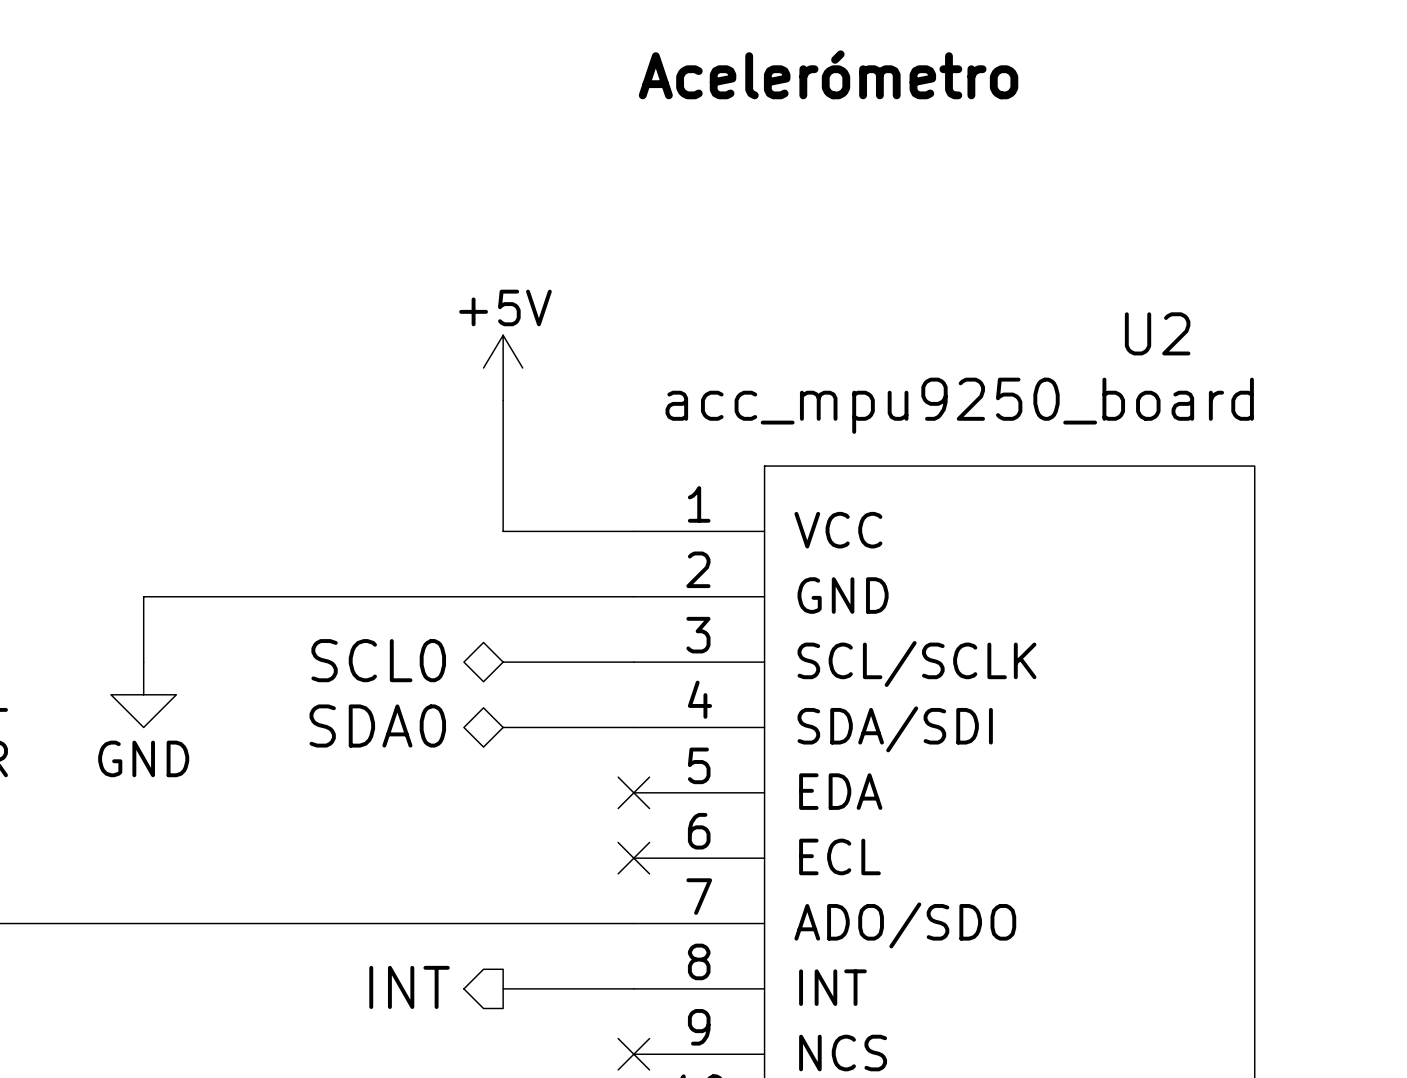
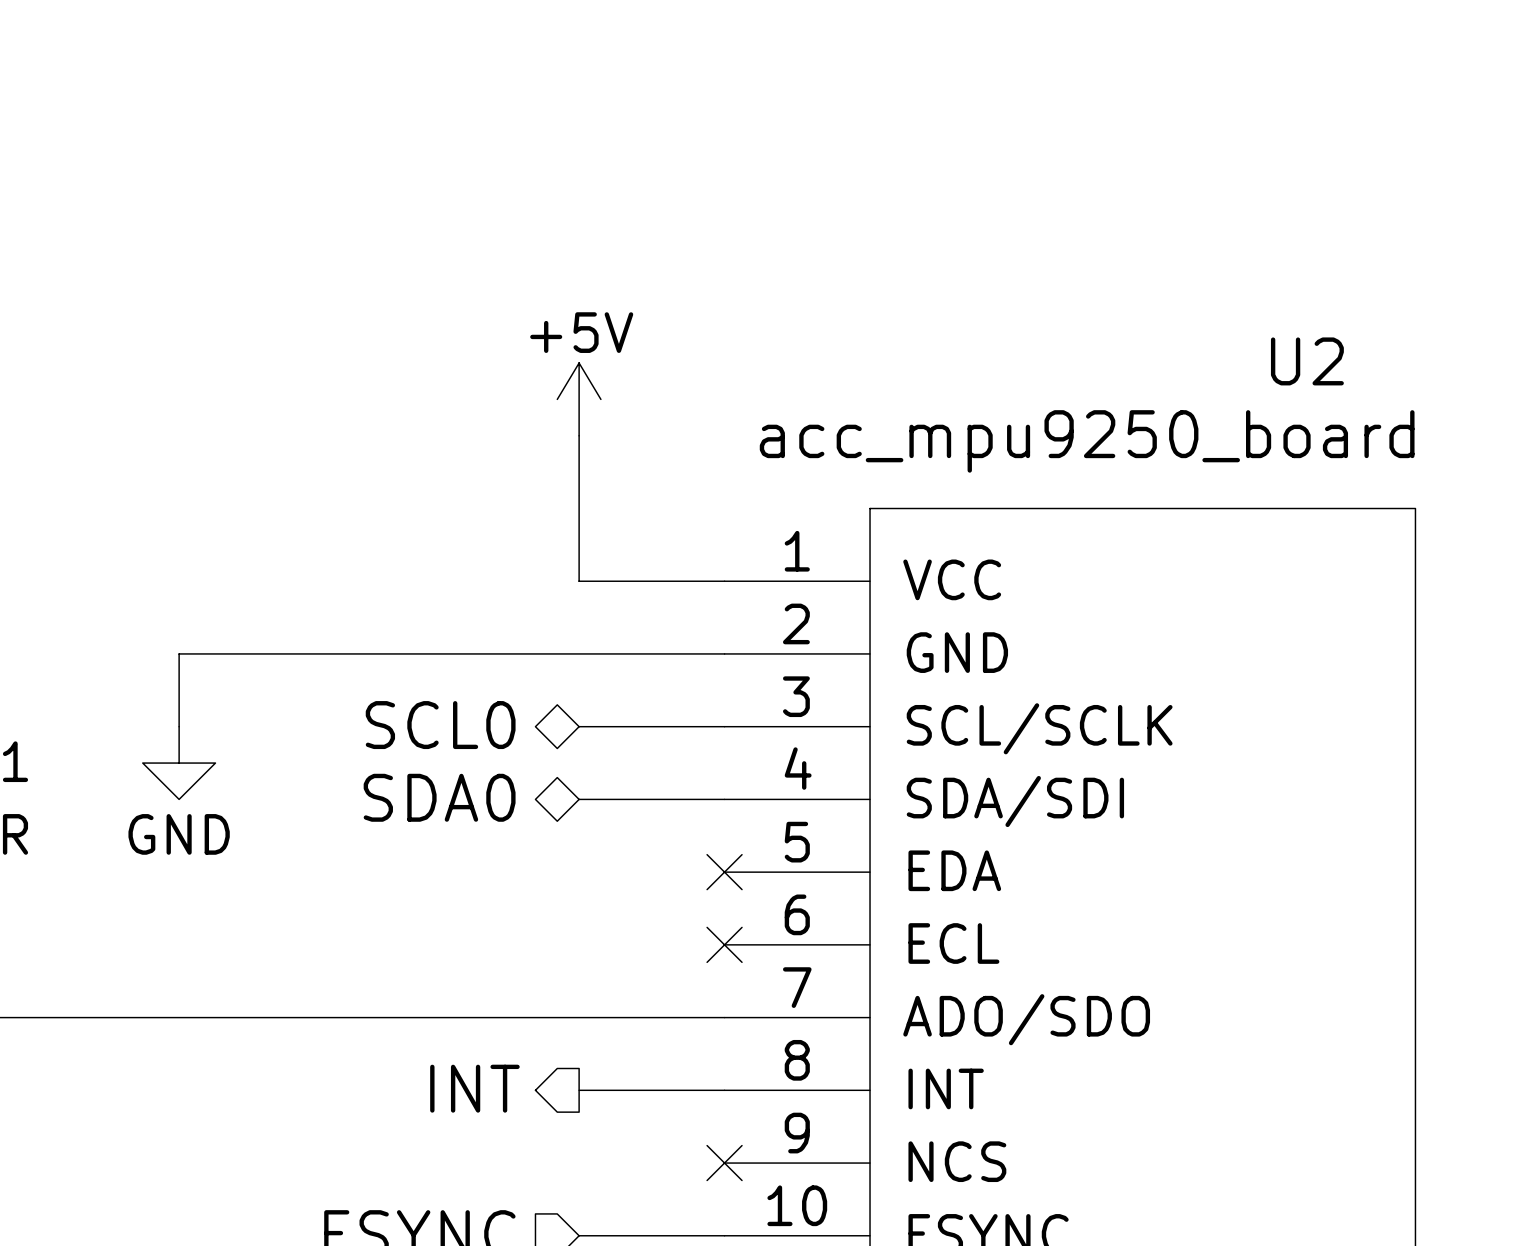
text: Acelerómetro (828, 74) -> none

